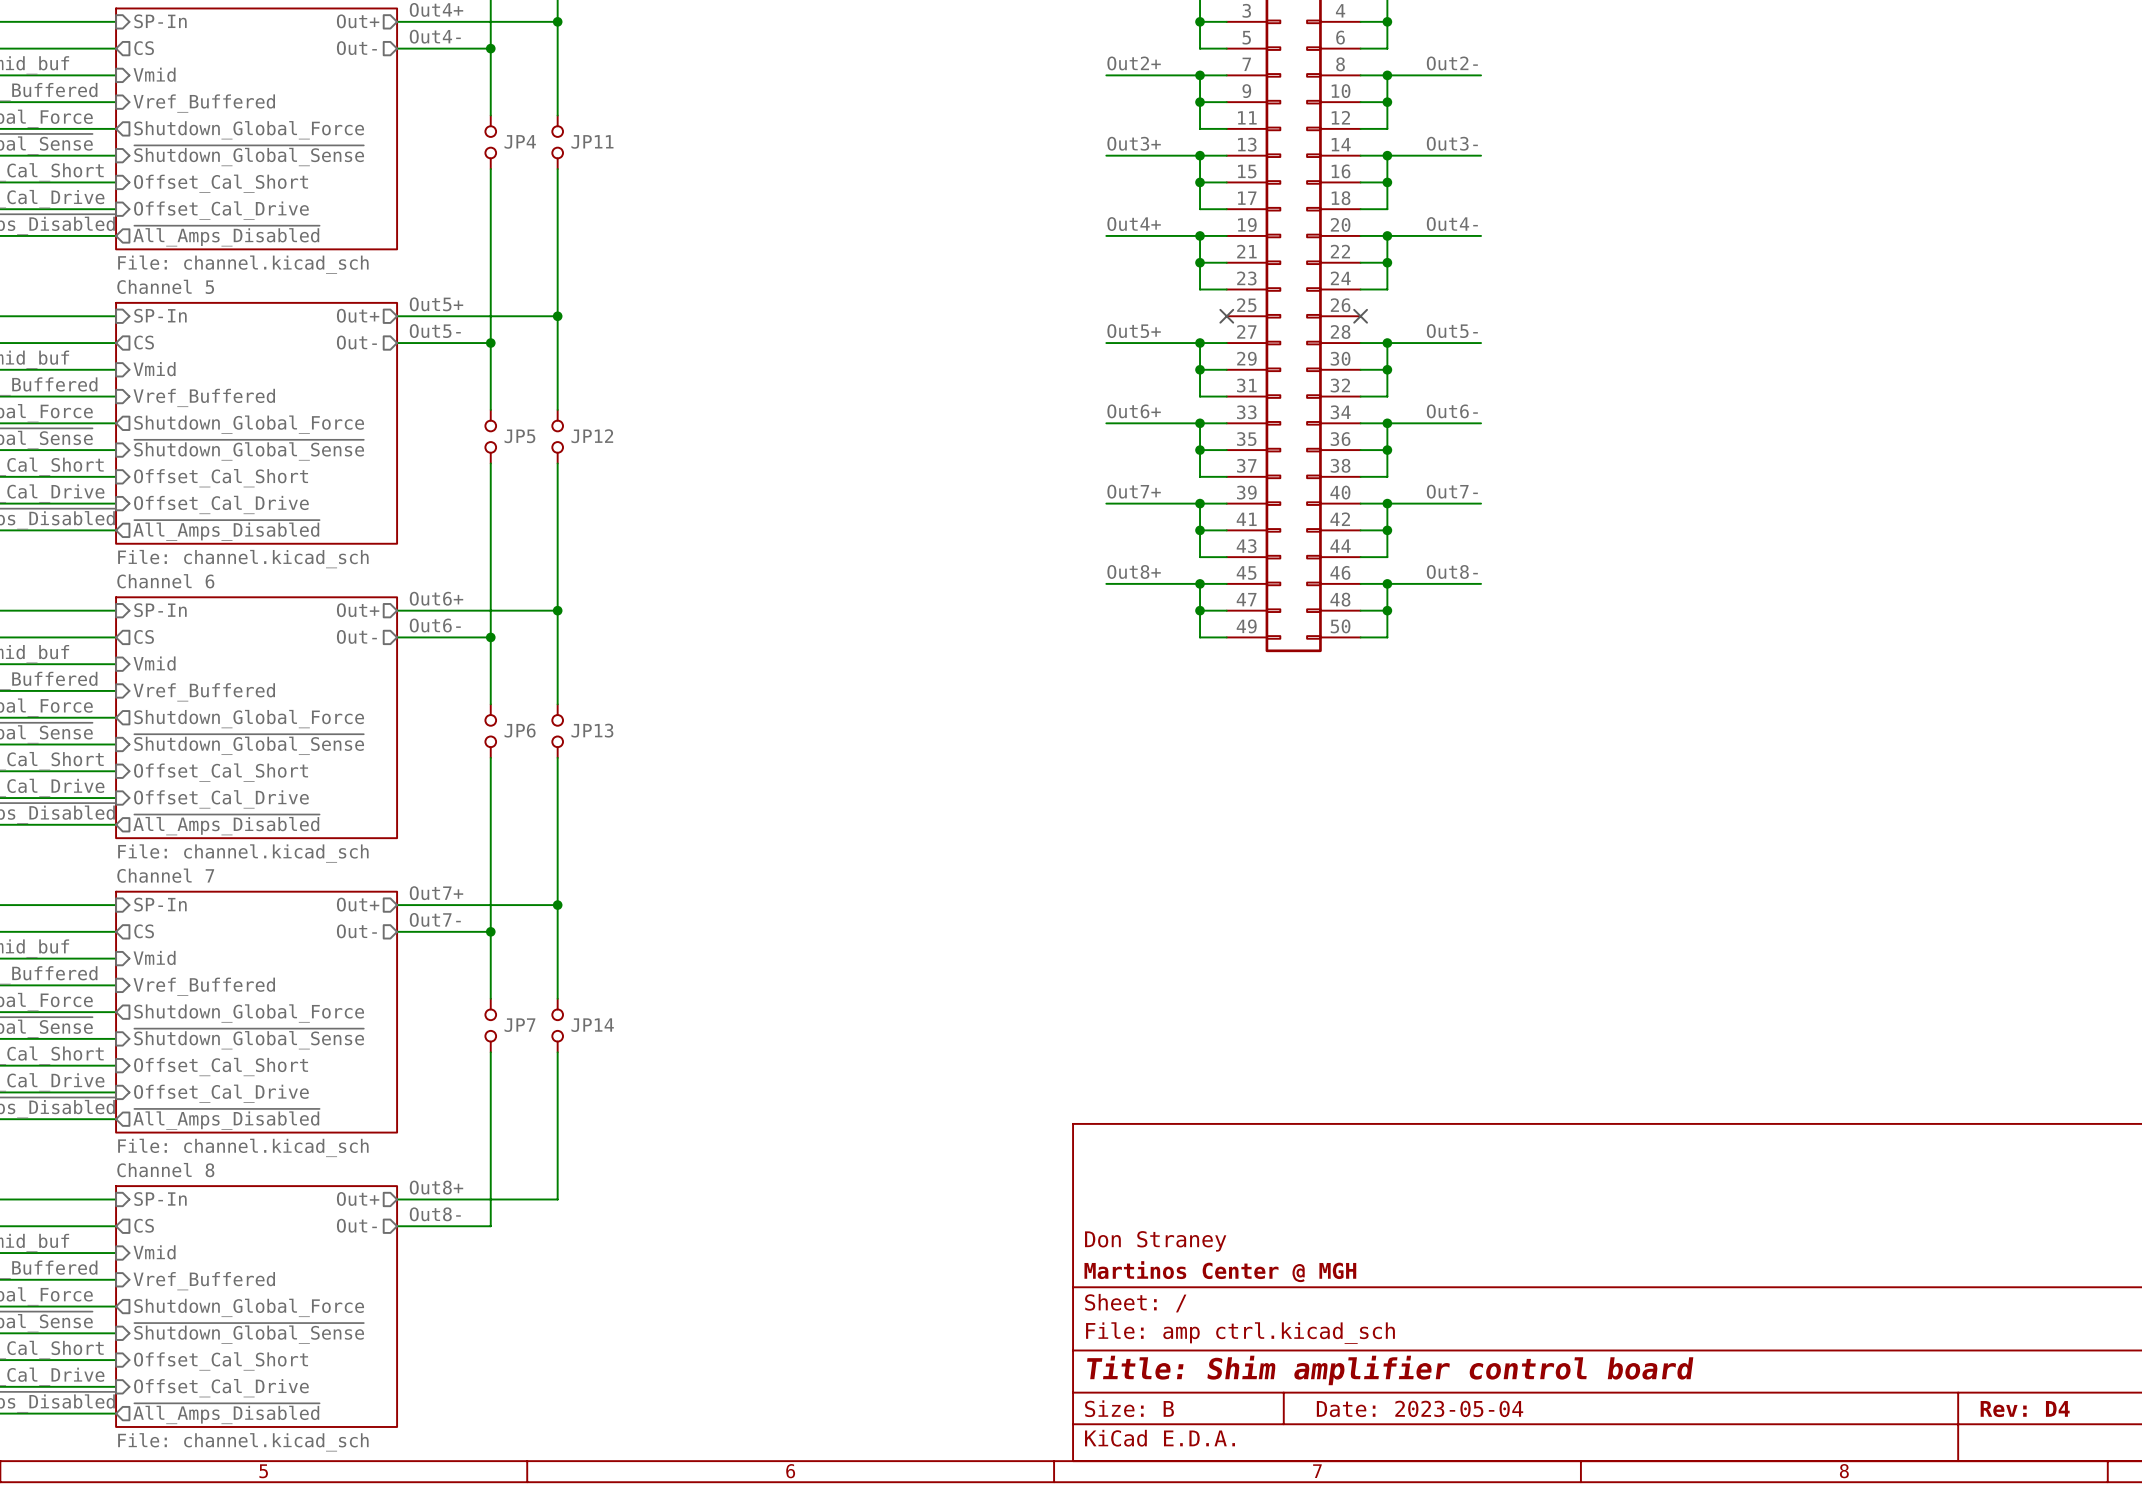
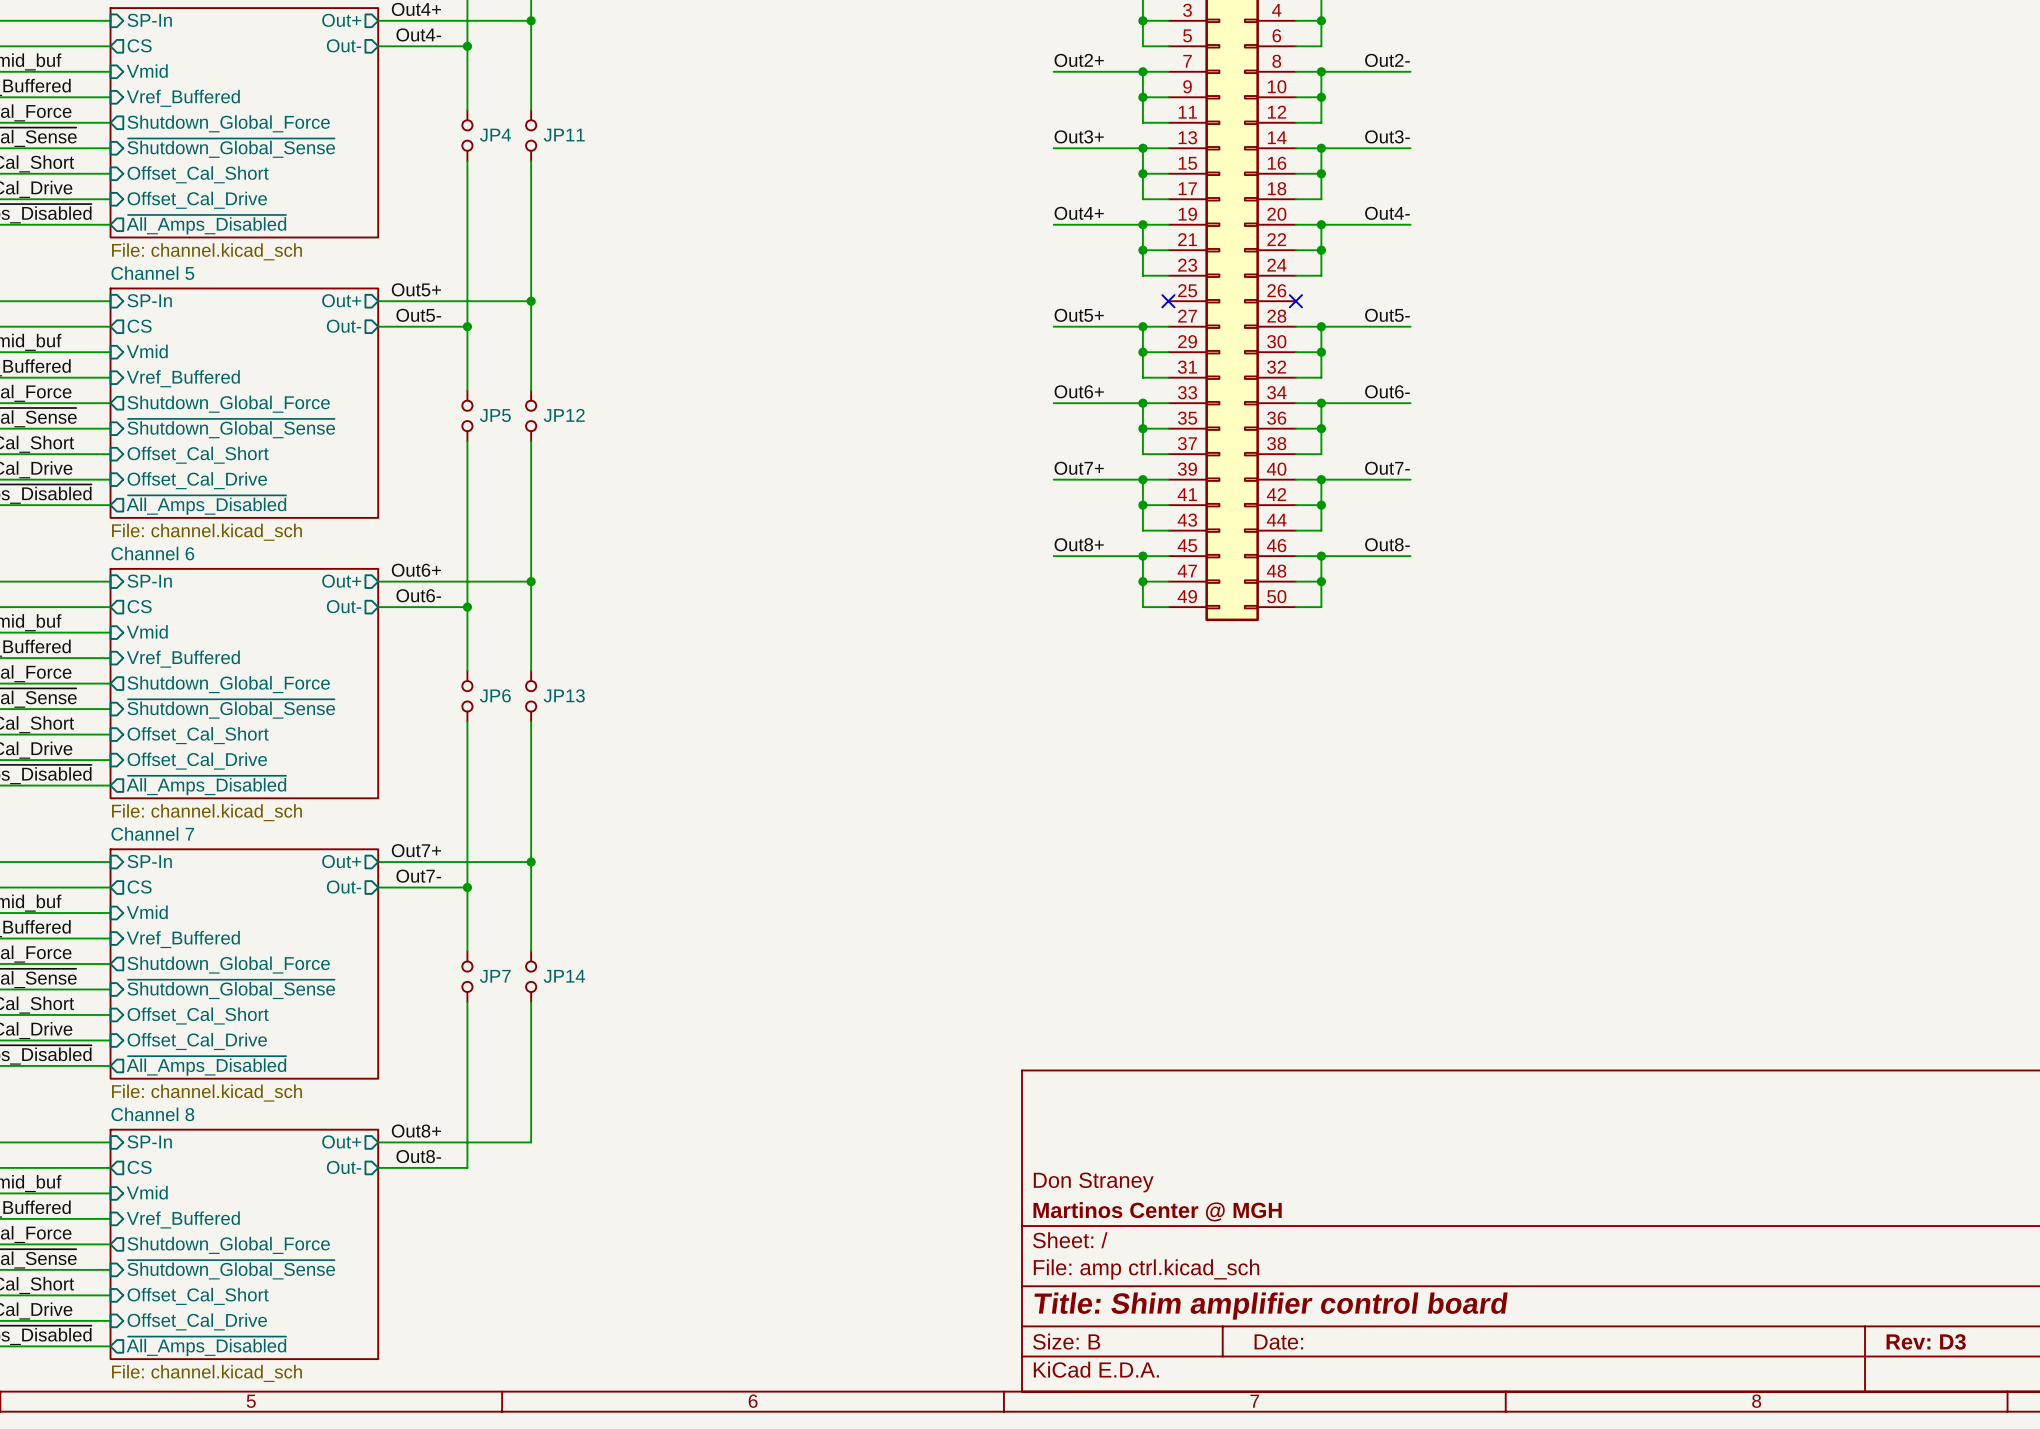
title block: Date: 2023-05-04 (1420, 1408) -> Date: (1278, 1342)
title block: Rev: D4 (2025, 1409) -> Rev: D3 (1926, 1341)

